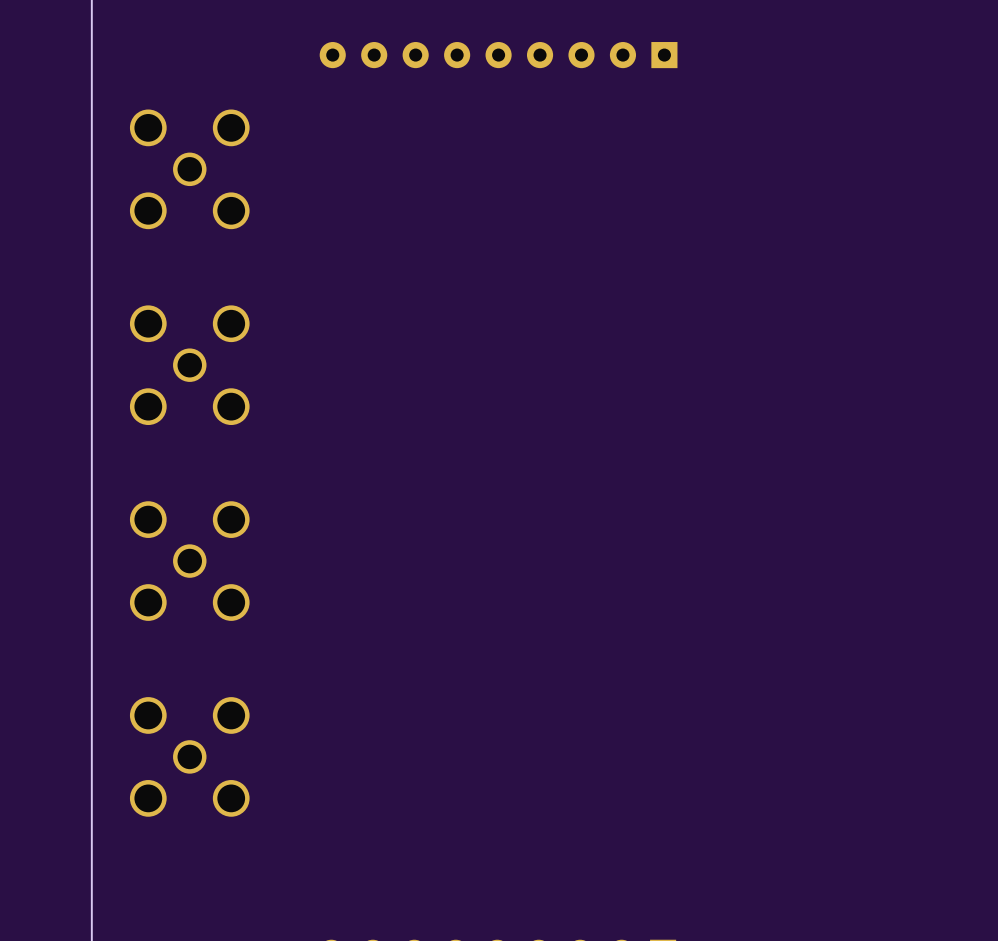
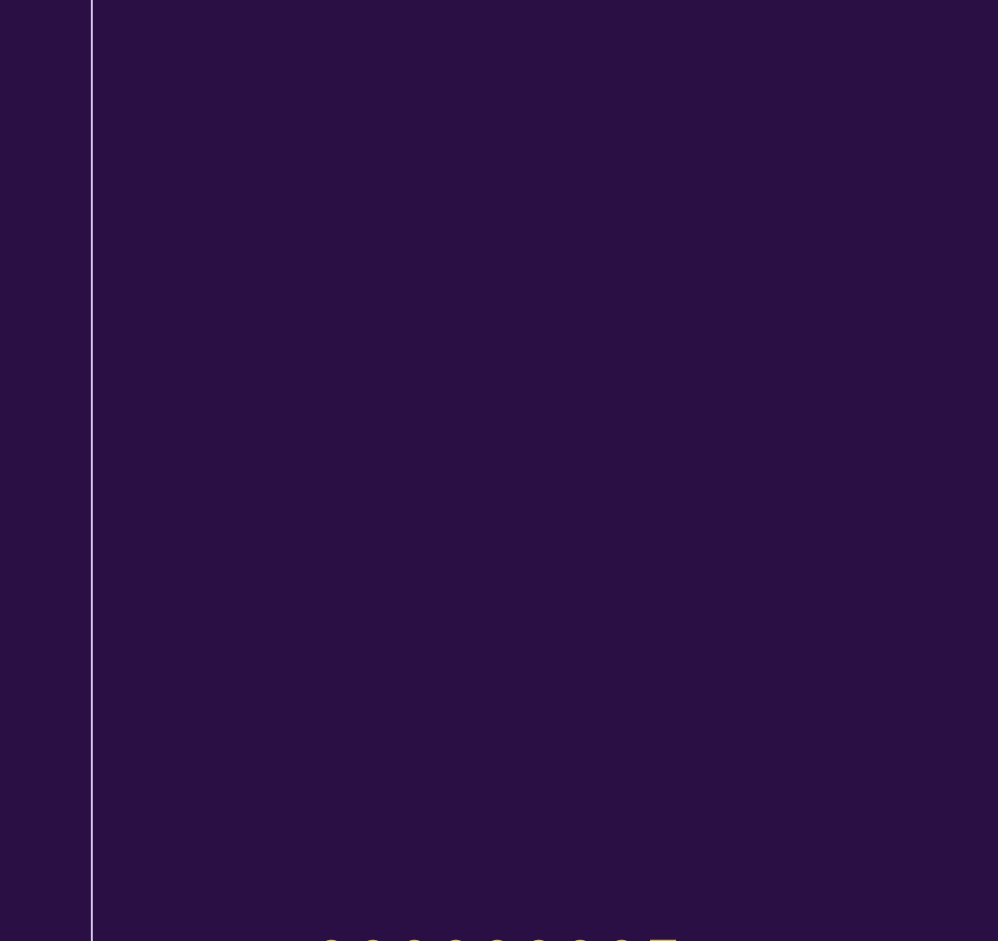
part: (498, 55) -> none
part: (189, 169) -> none
part: (189, 365) -> none
part: (189, 561) -> none
part: (189, 756) -> none

